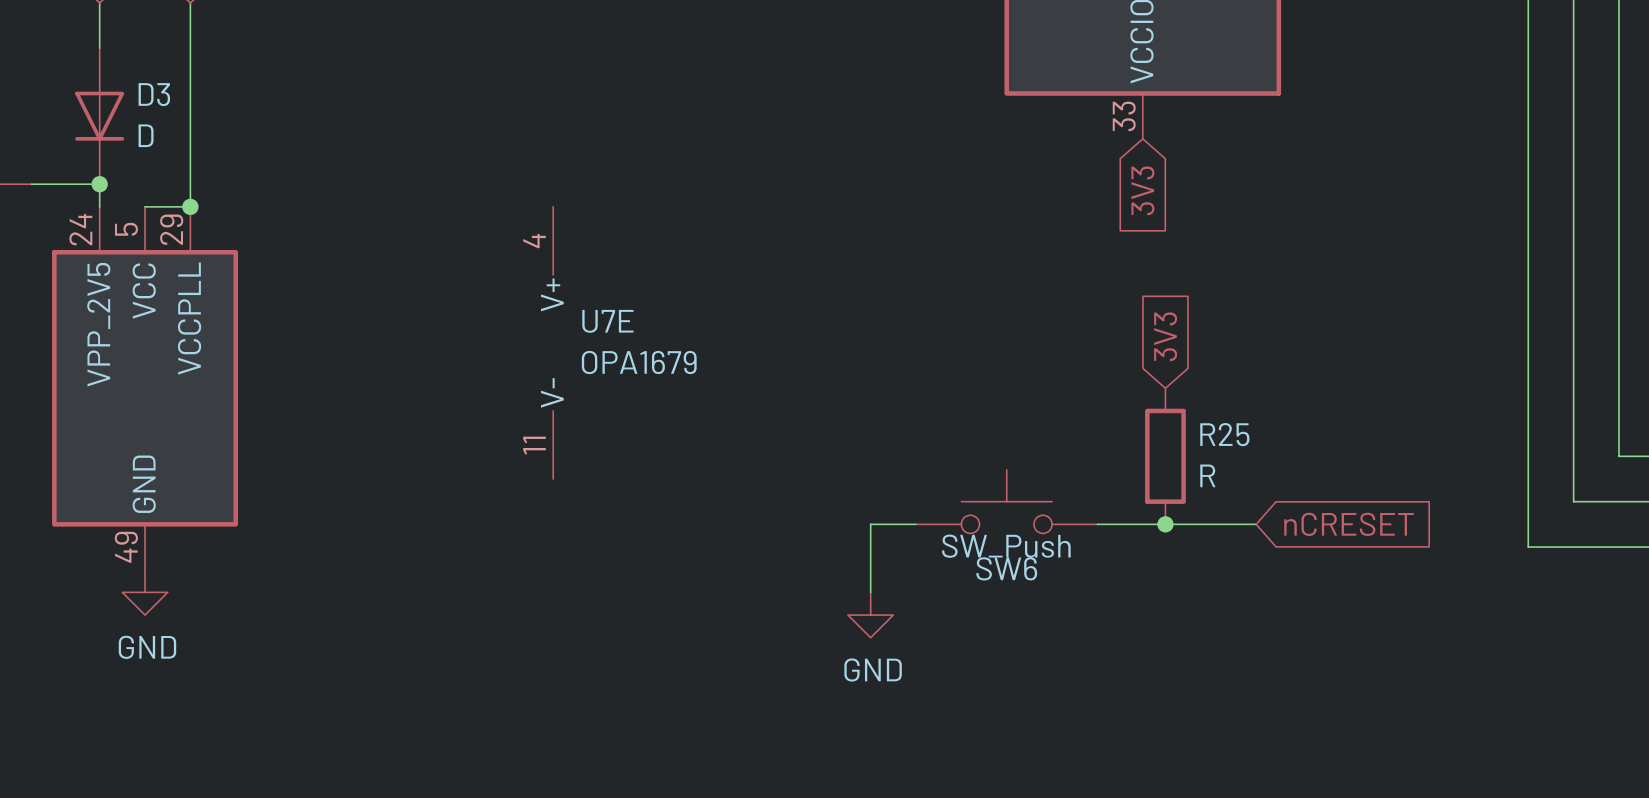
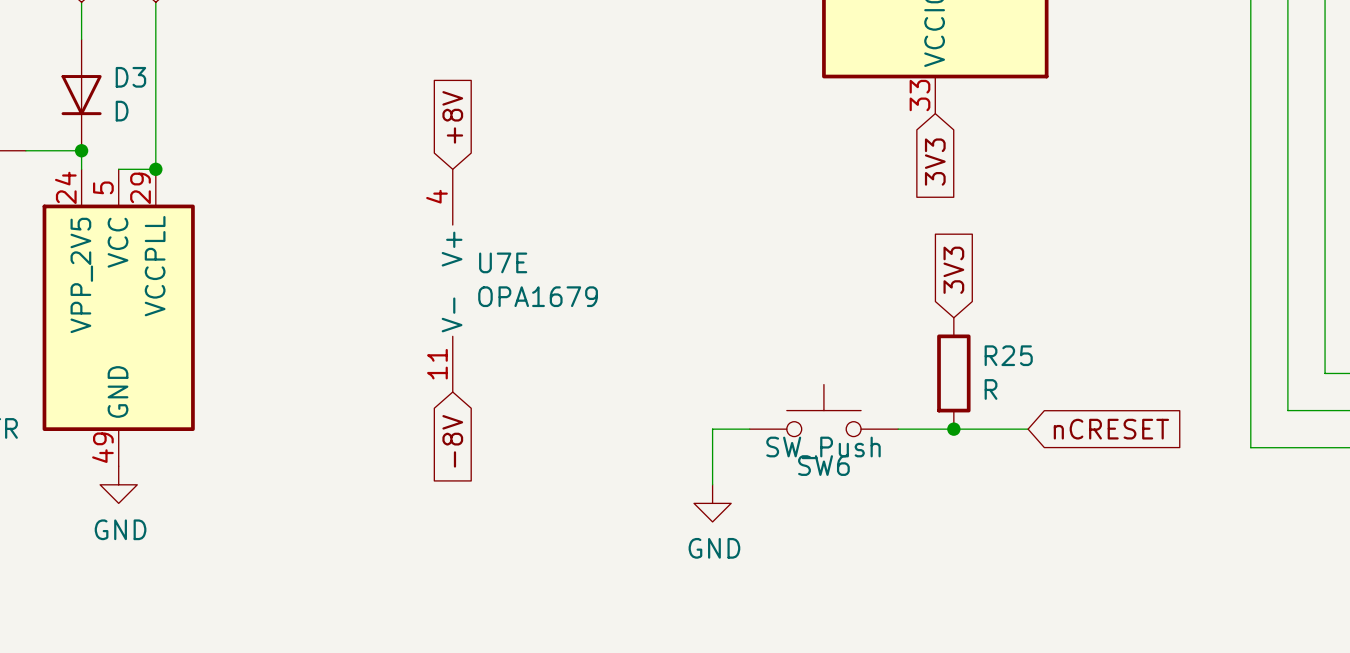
global label: none -> +8V (452, 117)
global label: none -> -8V (452, 441)

